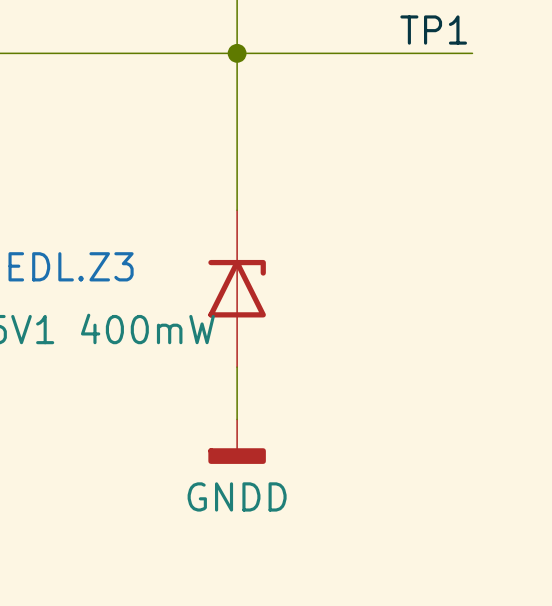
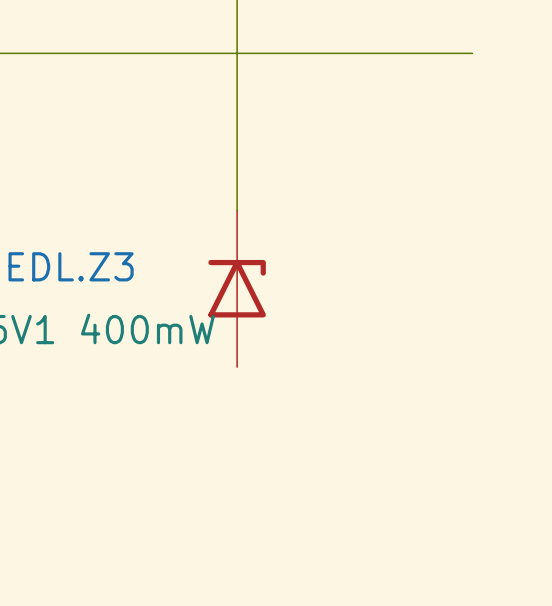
label: TP1 (433, 30) -> none
junction: (237, 53) -> none
wire: (237, 367) (237, 419) -> none
power symbol: GNDD (237, 441) -> none

